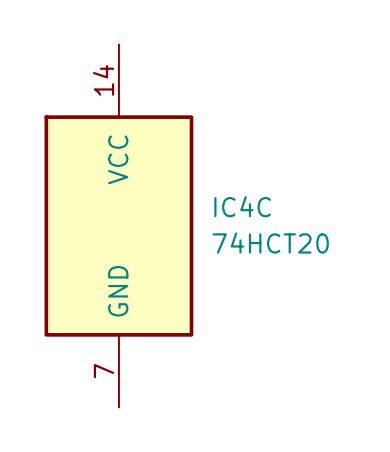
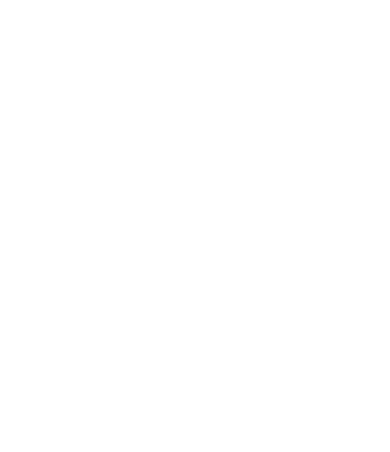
IC4C: 74HCT20 (118, 225) -> none

